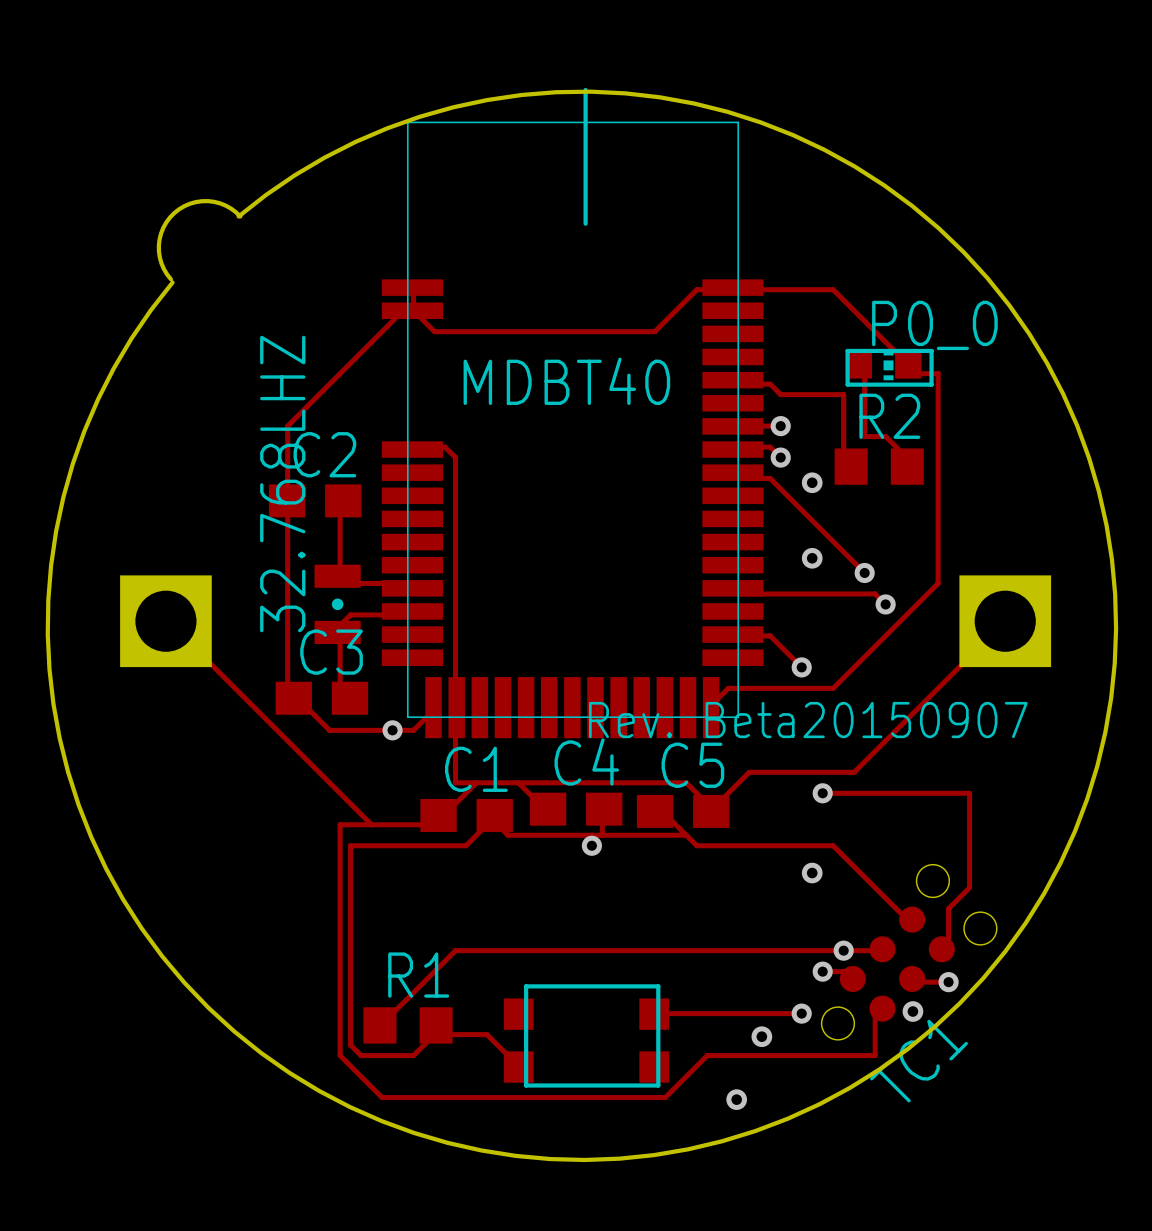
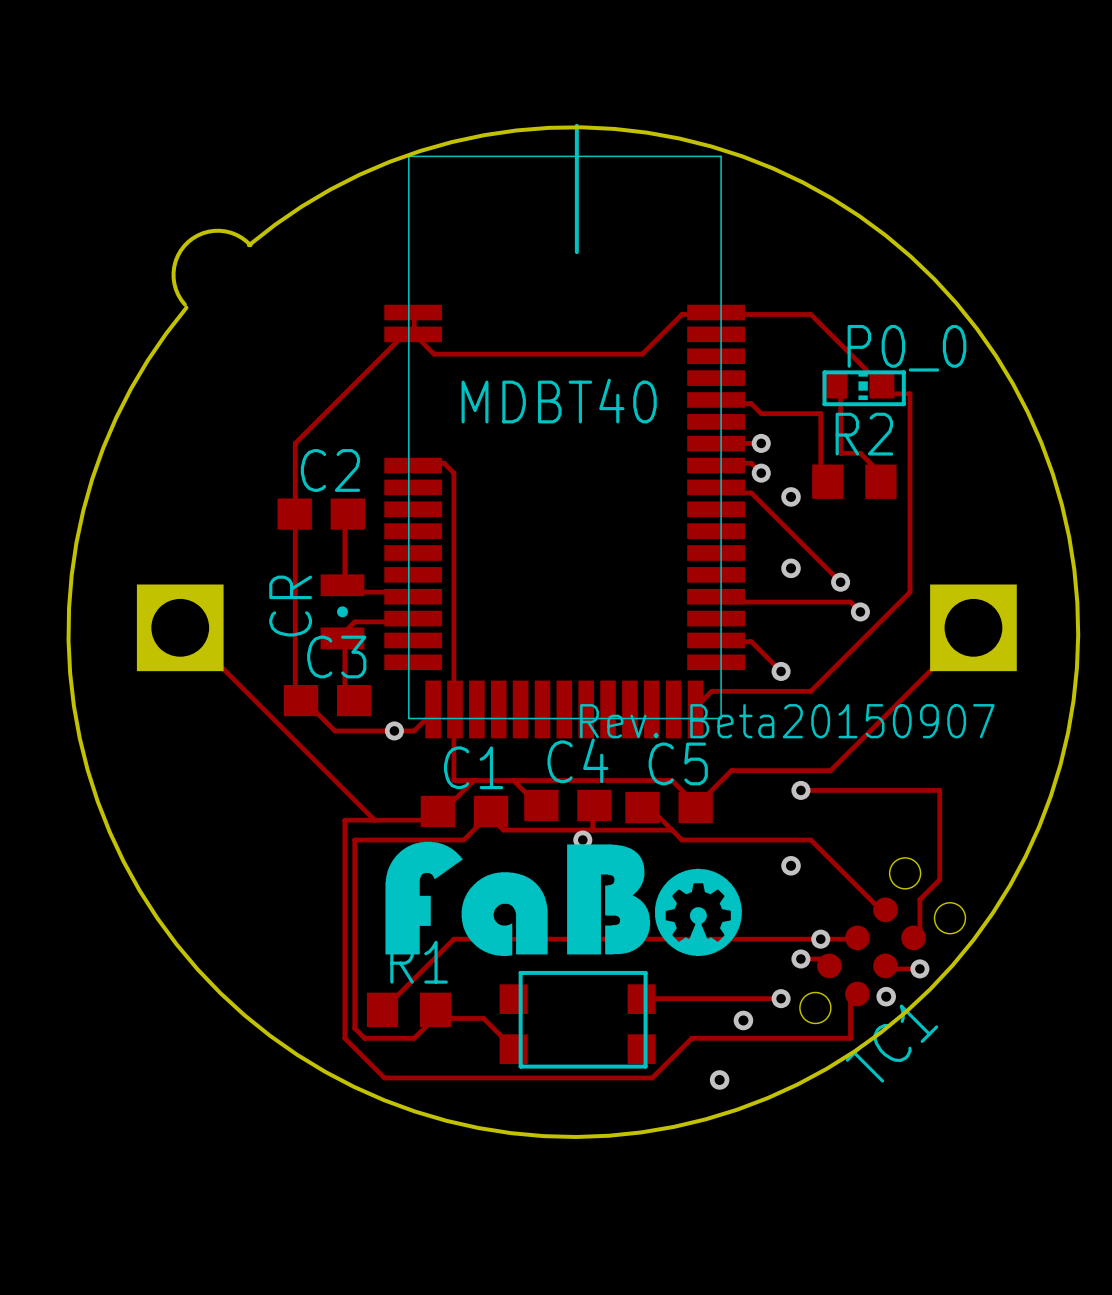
32.768LHZ name: 32.768LHZ (282, 484) -> CR (290, 606)
drawing: none -> [385, 841, 742, 956]

